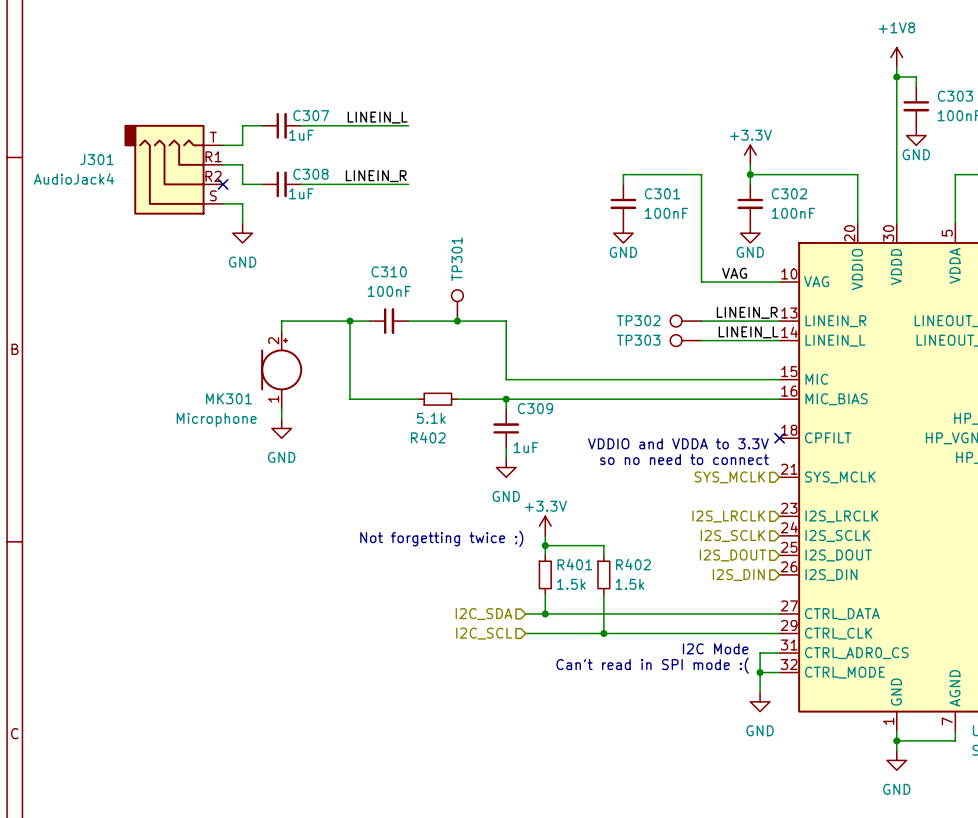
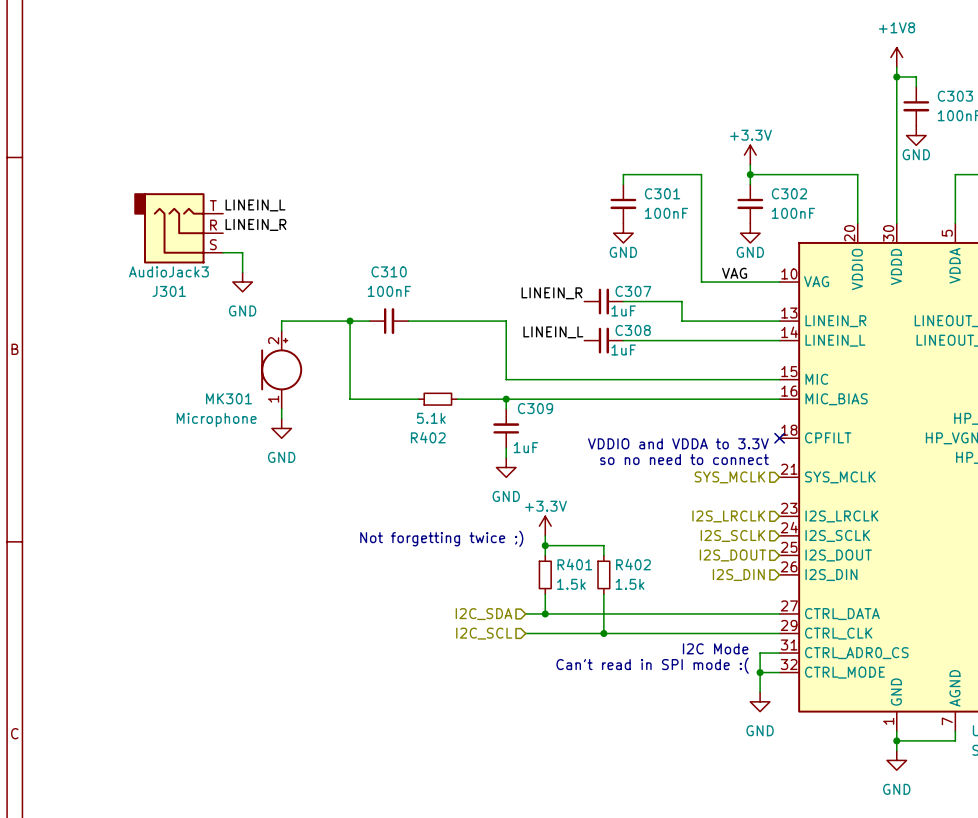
label: LINEIN_L (377, 117) -> none
J301 symbol: [124, 124, 224, 215] -> [134, 193, 224, 264]
wire: (262, 125) (242, 125) (242, 145) (223, 145) -> none
C307 position: (281, 125) -> (603, 301)
wire: (301, 125) (408, 125) -> none
J301 name position: J301 (97, 159) -> J301 (169, 291)
wire: (223, 164) (242, 164) (242, 184) (262, 184) -> none
label: LINEIN_R (376, 176) -> none
J301 value: AudioJack4 (74, 178) -> AudioJack3 (168, 271)
no-connect mark: (223, 184) -> none
C308 position: (281, 184) -> (603, 340)
wire: (301, 184) (408, 184) -> none
wire: (223, 203) (242, 203) (242, 223) -> (223, 252) (242, 252) (242, 272)
label: none -> LINEIN_L (255, 205)
label: none -> LINEIN_R (255, 224)
power symbol position: GND (242, 233) -> GND (242, 282)
label: none -> LINEIN_R (551, 293)
wire: none -> (623, 301) (681, 301) (681, 321) (701, 321)
TP301: (457, 305) -> none
label: LINEIN_R (747, 312) -> none
junction: (457, 321) -> none
TP302: (685, 321) -> none
label: none -> LINEIN_L (553, 332)
label: LINEIN_L (748, 332) -> none
wire: none -> (623, 340) (701, 340)
TP303: (685, 340) -> none

